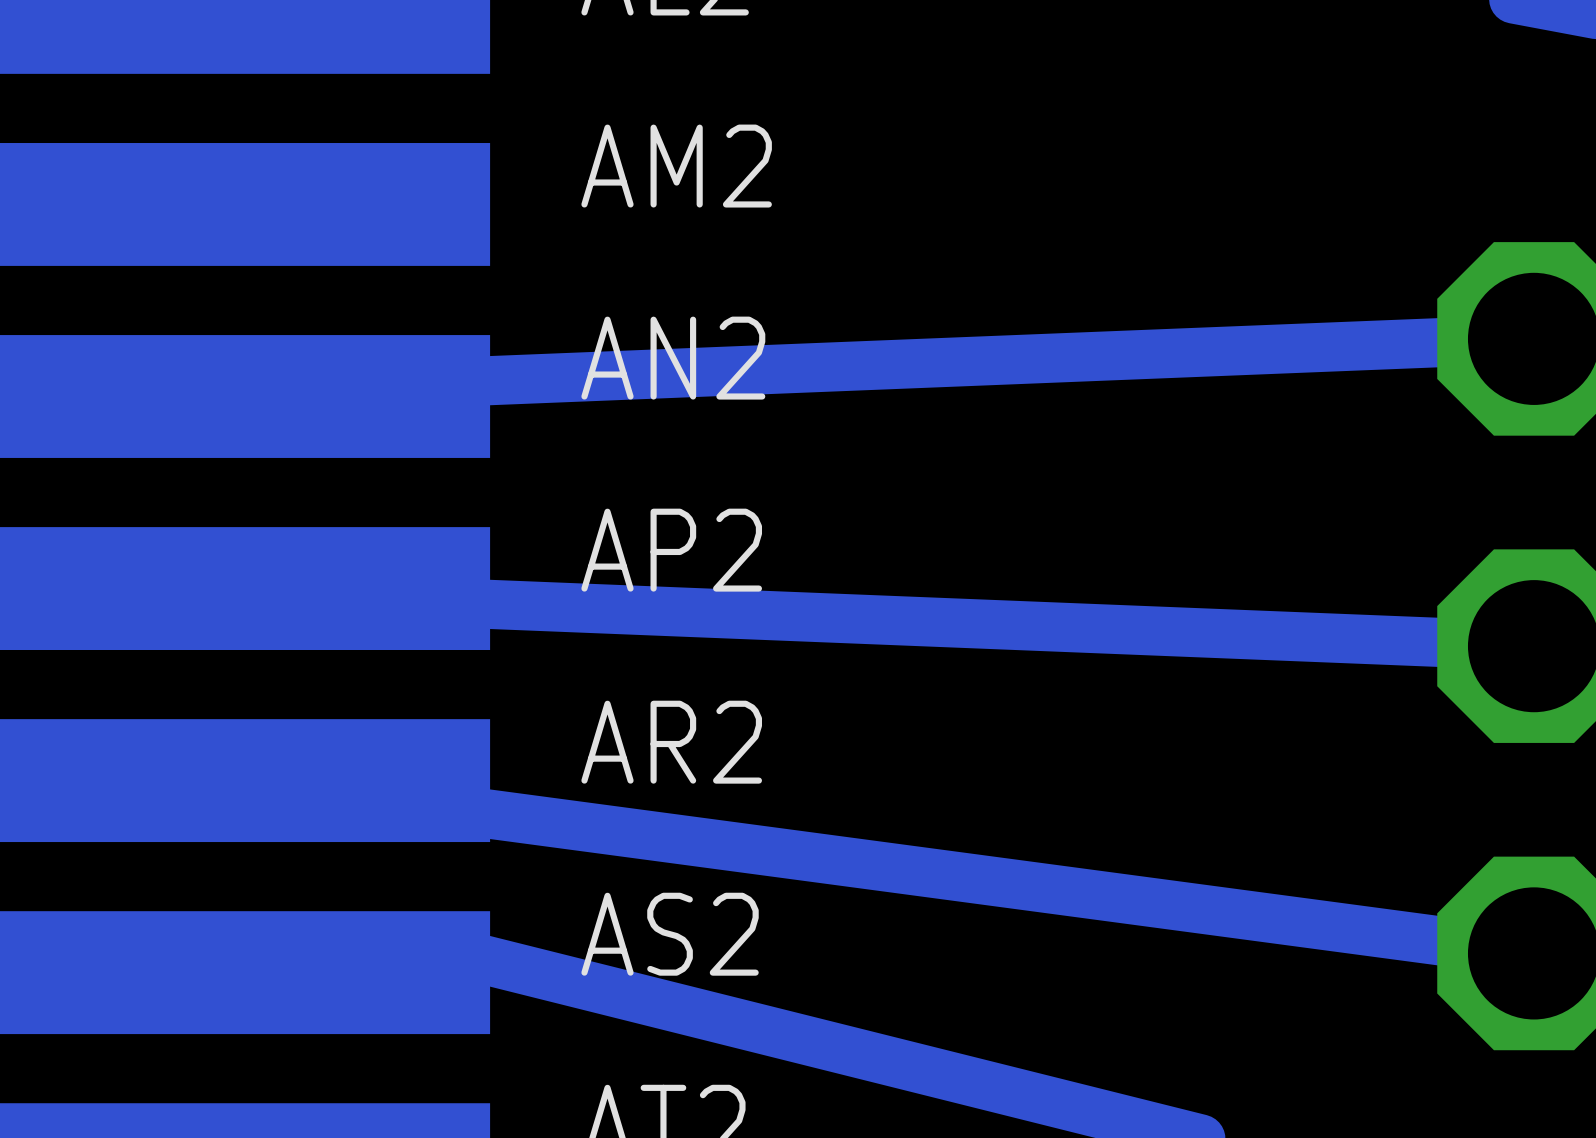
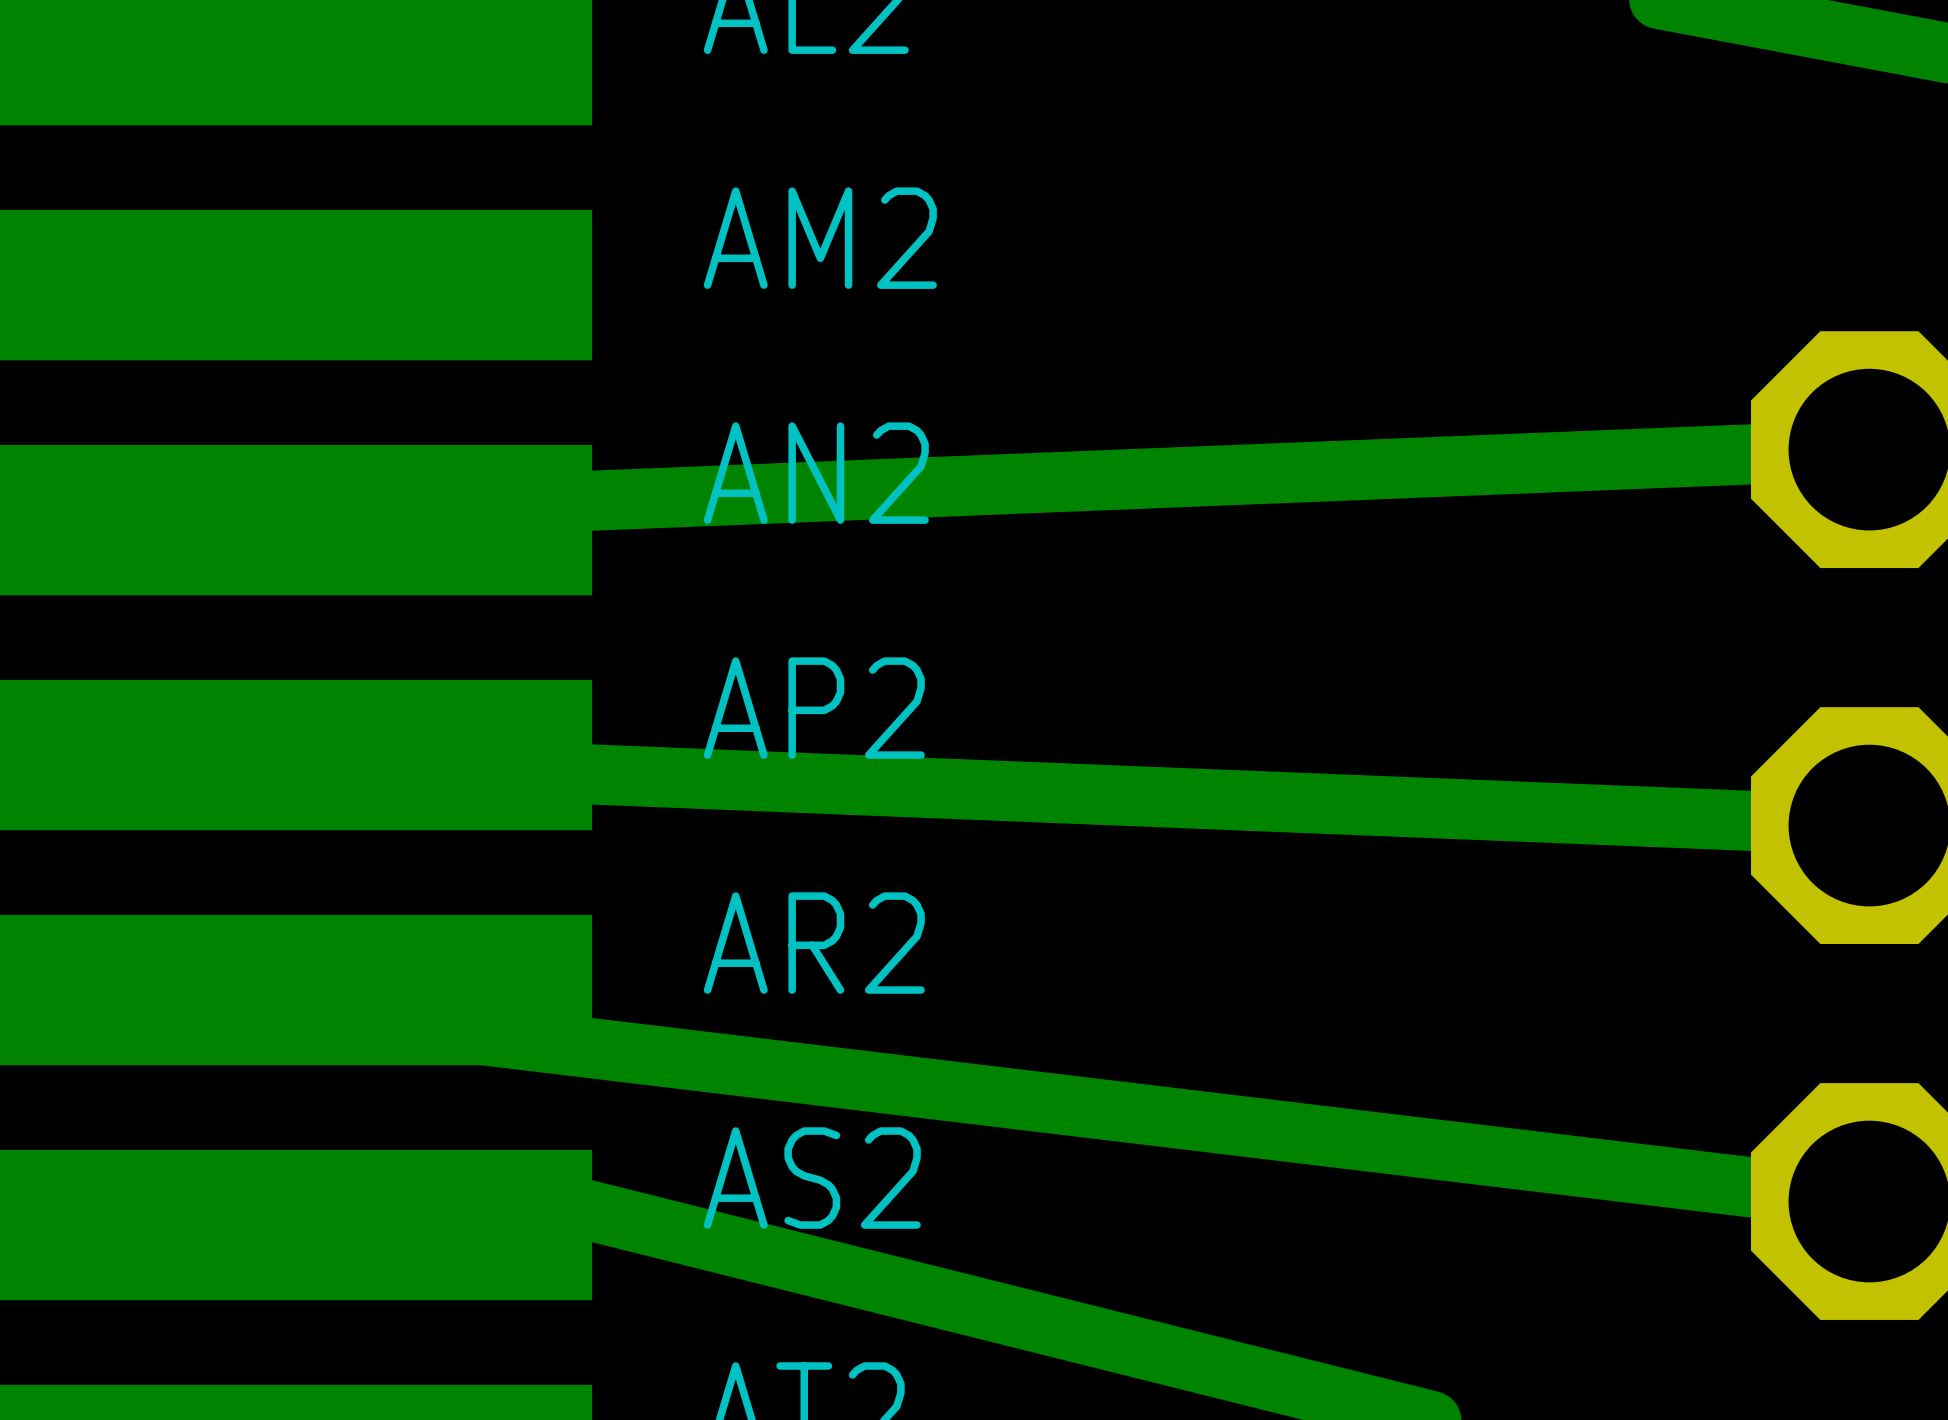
track: (93, 780) (381, 799) (1534, 953) -> (107, 990) (1869, 1201)

